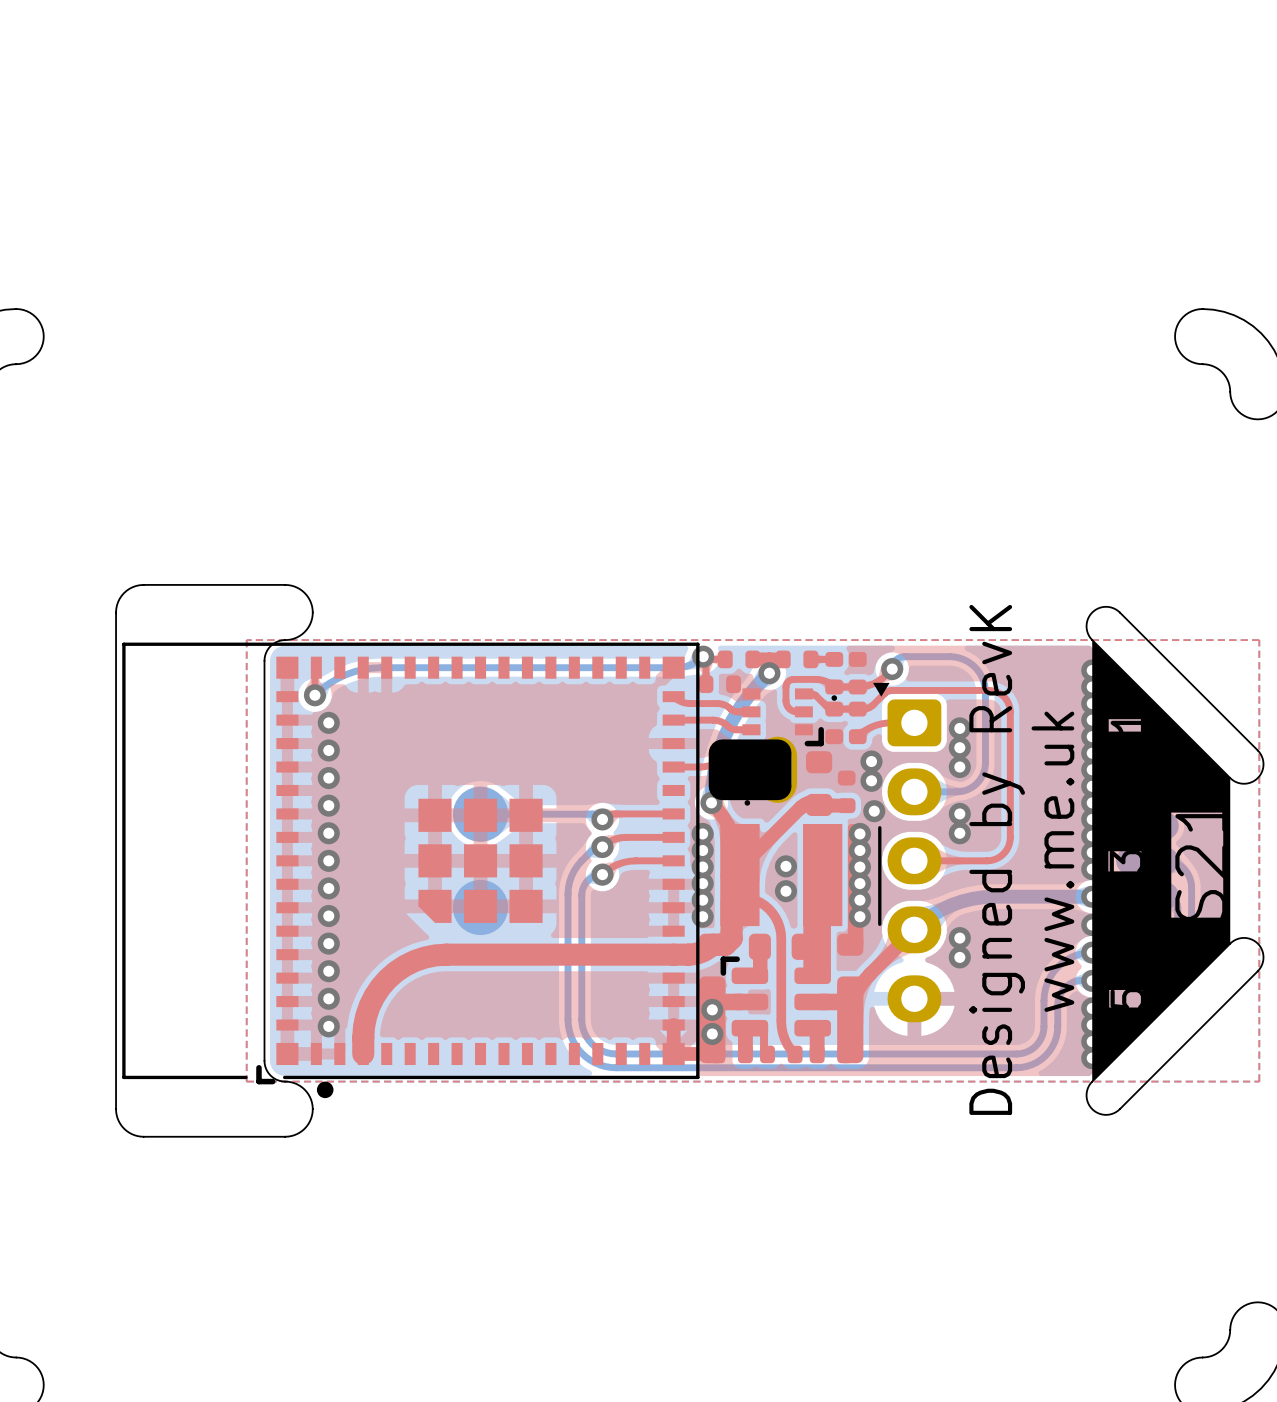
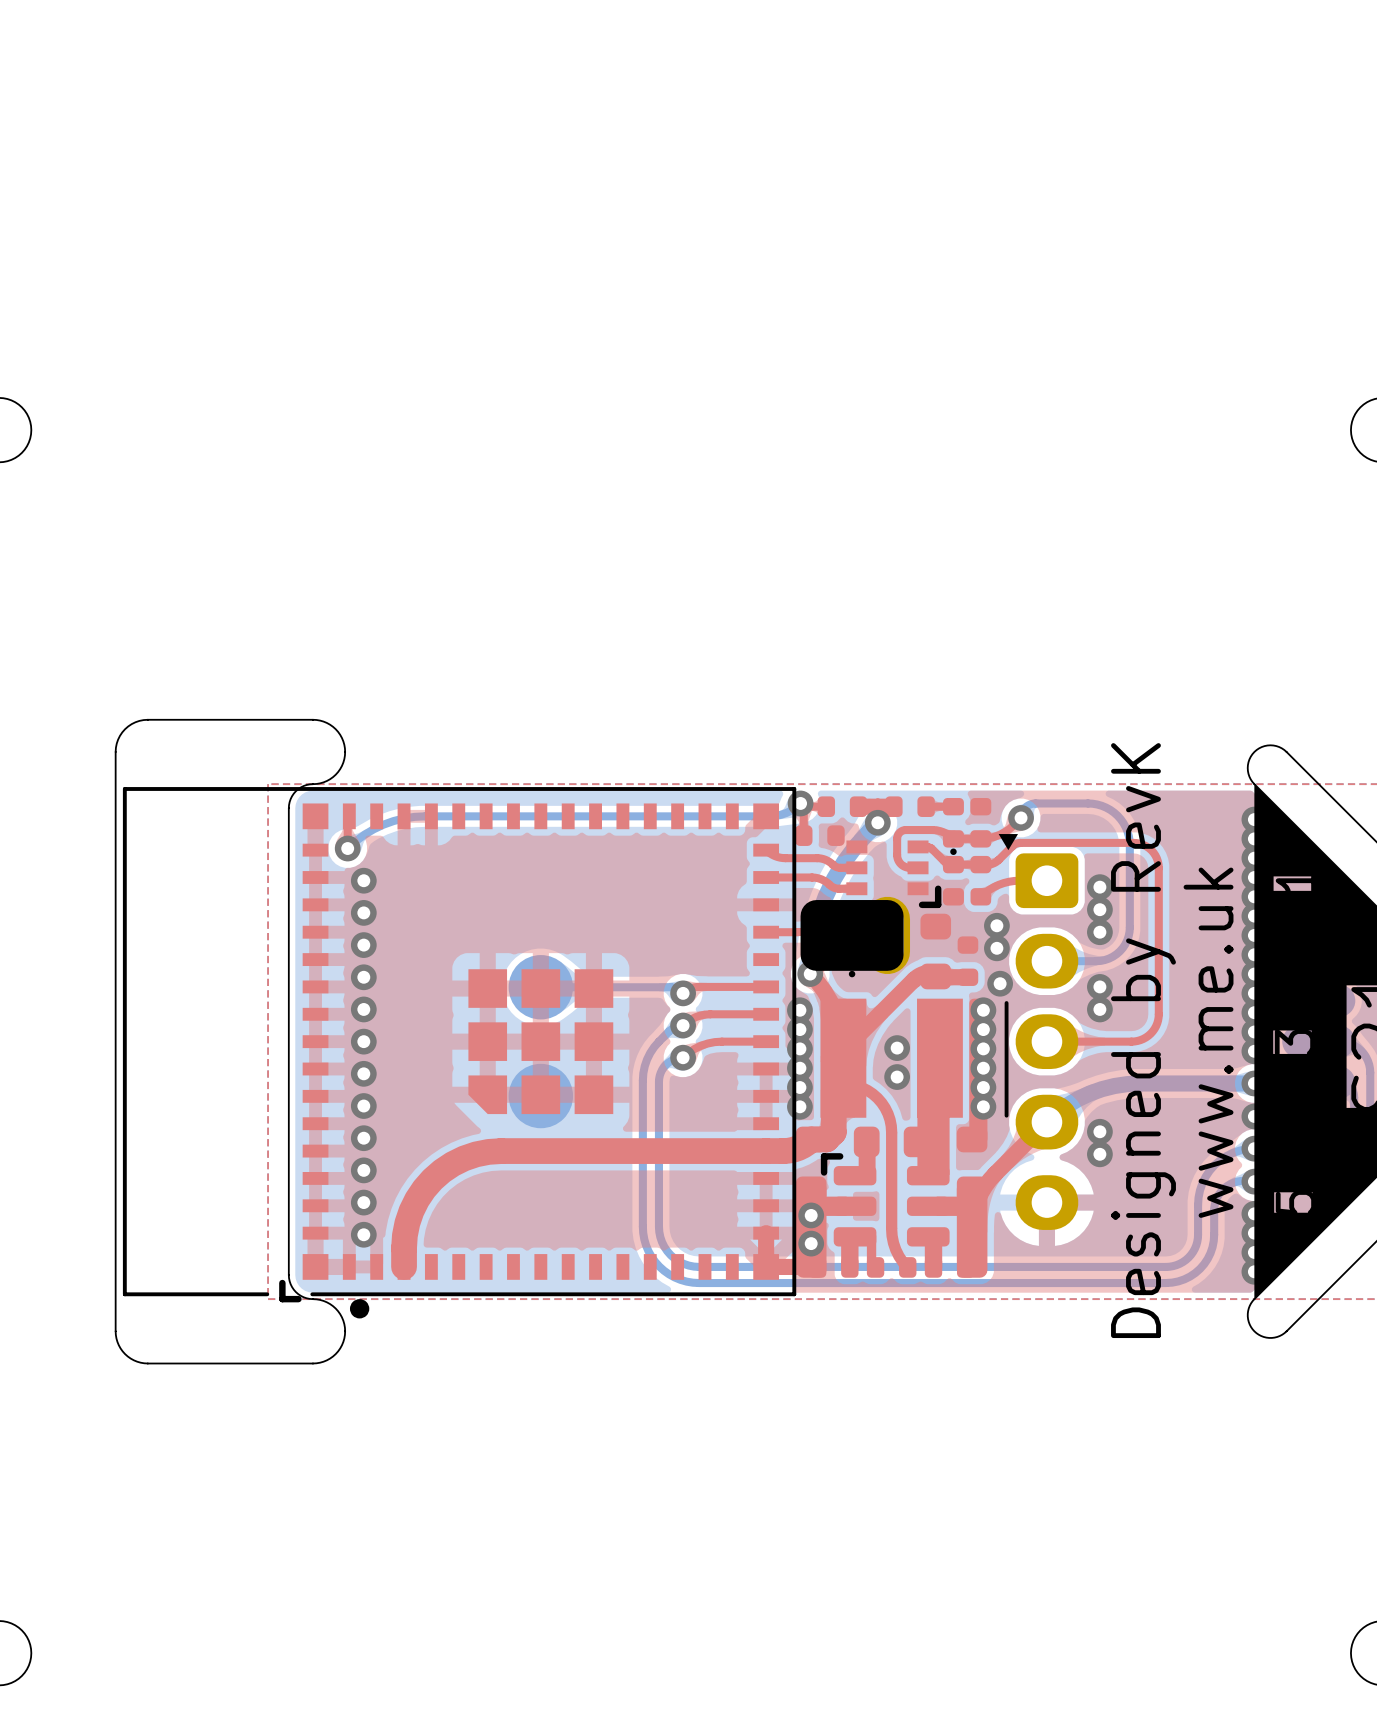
drawing shape: [708, 739, 792, 801] -> [800, 900, 904, 971]

